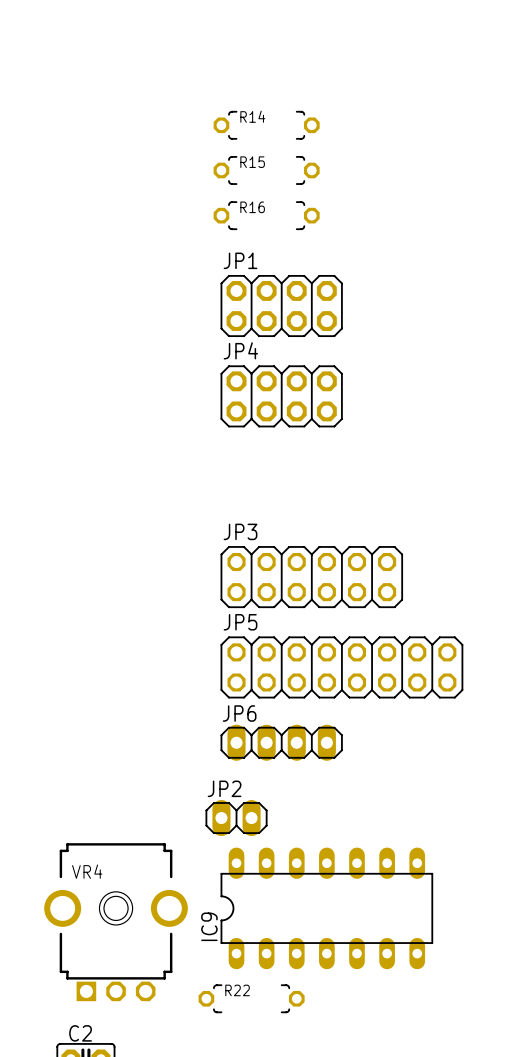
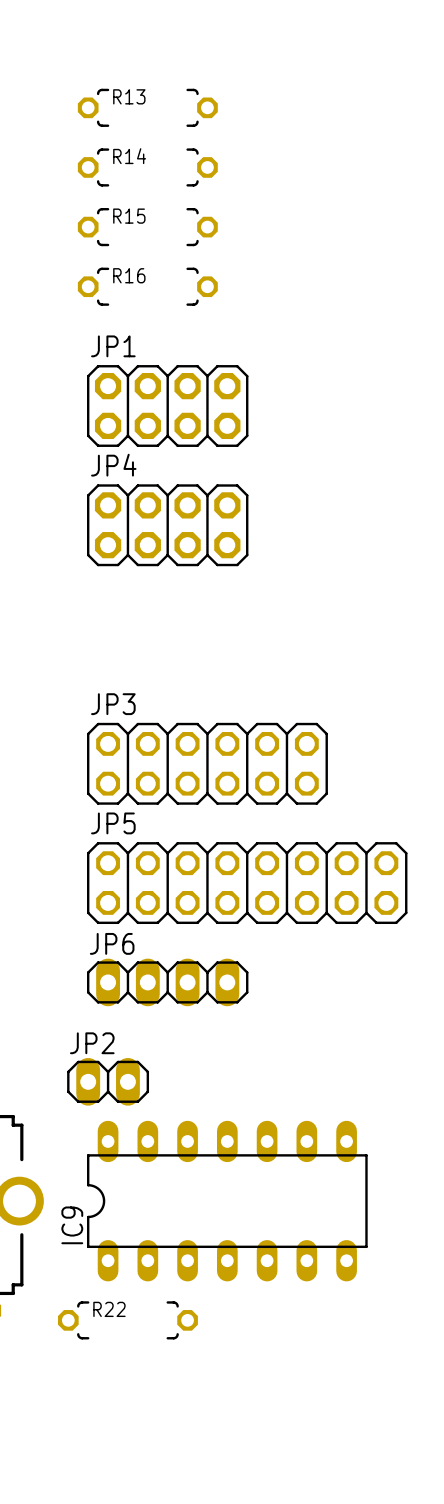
R13: none -> (147, 107)

